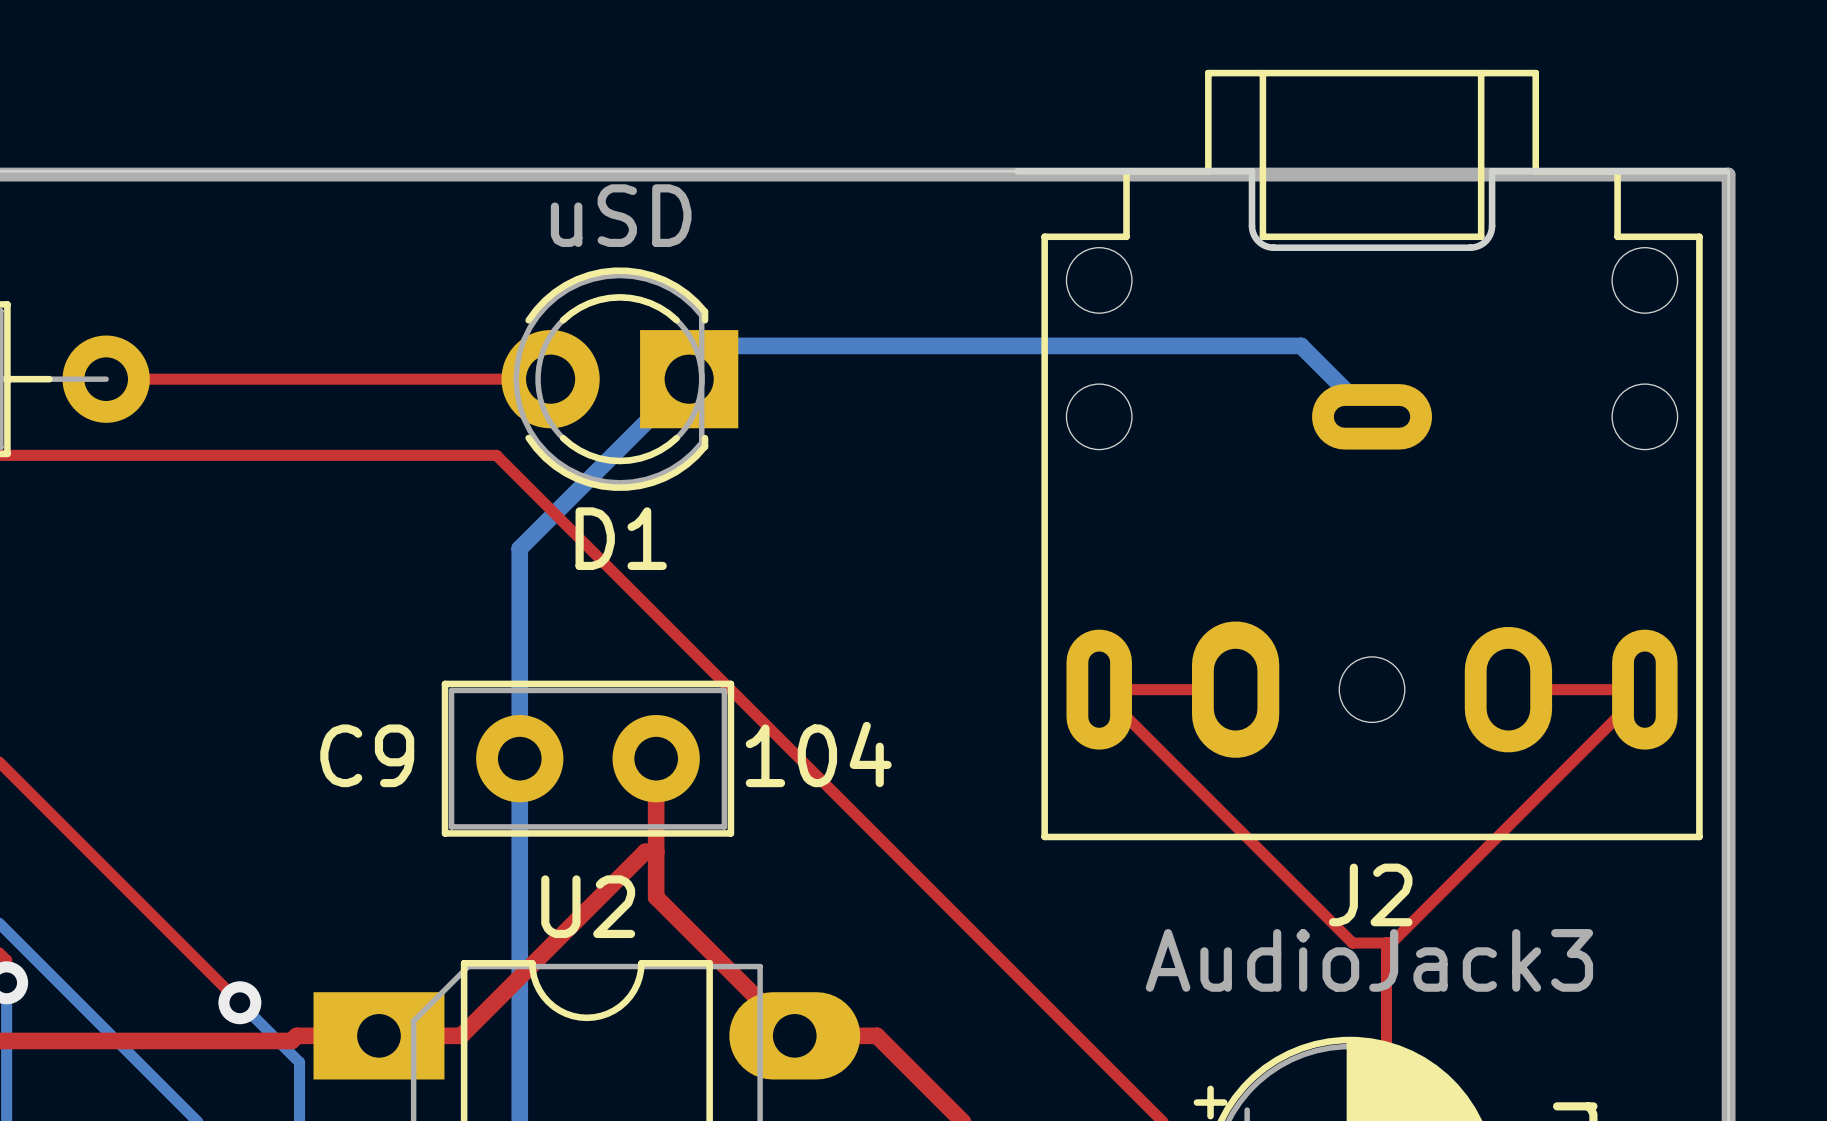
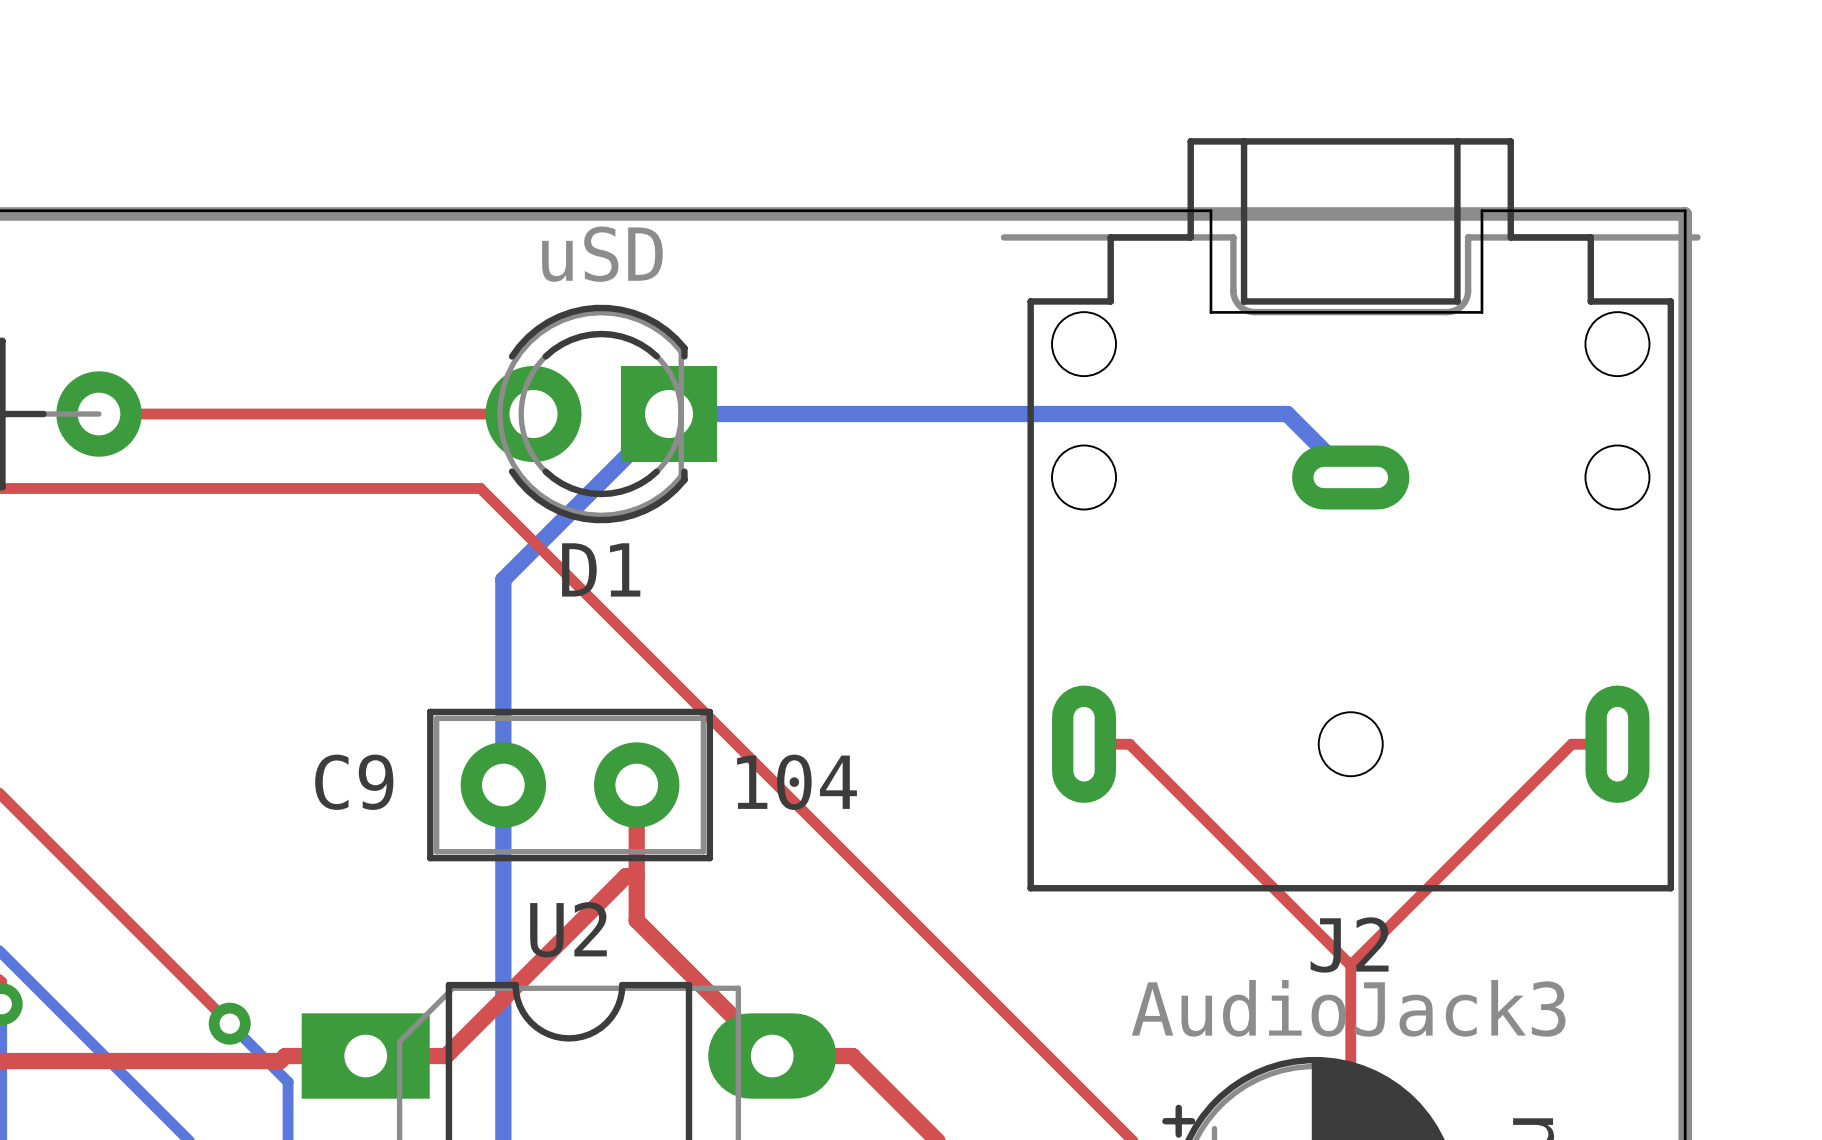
J2 footprint: [1014, 69, 1730, 841] -> [1000, 138, 1701, 892]
board edge: none -> (989, 210) (1210, 210) (1210, 312) (1481, 312) (1481, 210) (1683, 210)
bottom track: (700, 379) (733, 345) (1301, 345) (1372, 416) -> (679, 414) (1287, 414) (1350, 477)
top track: (1235, 689) (1099, 689) (1352, 943) (1391, 943) (1644, 689) (1508, 689) -> none
top track: none -> (1084, 744) (1129, 744) (1350, 965) (1571, 744) (1617, 744)

